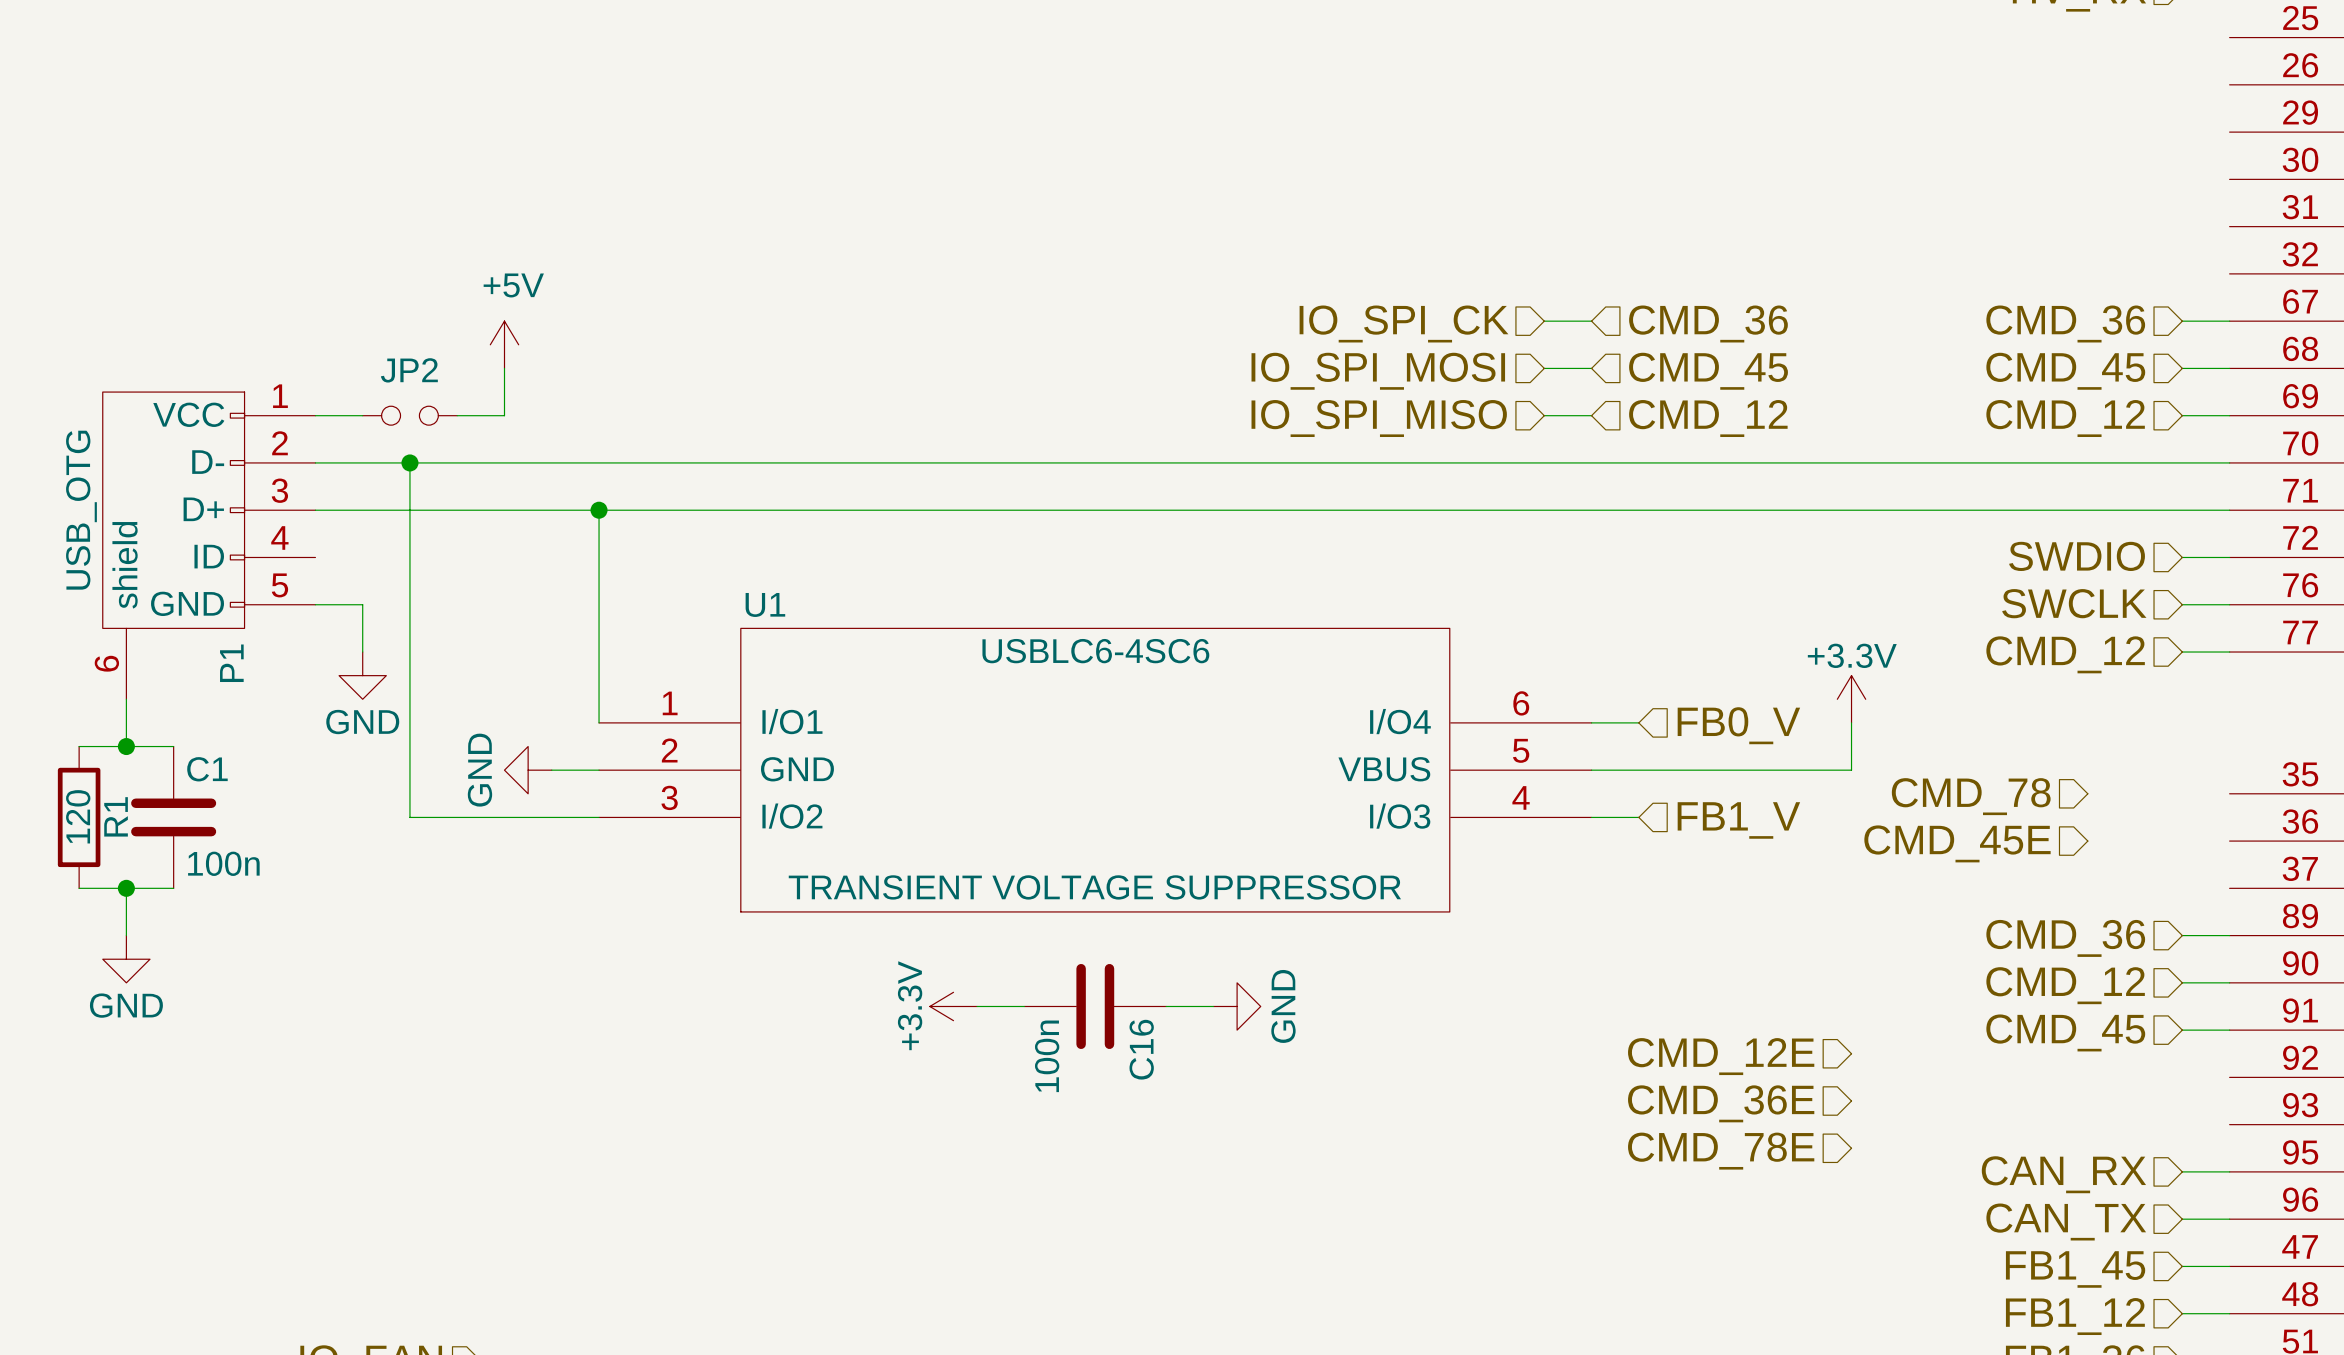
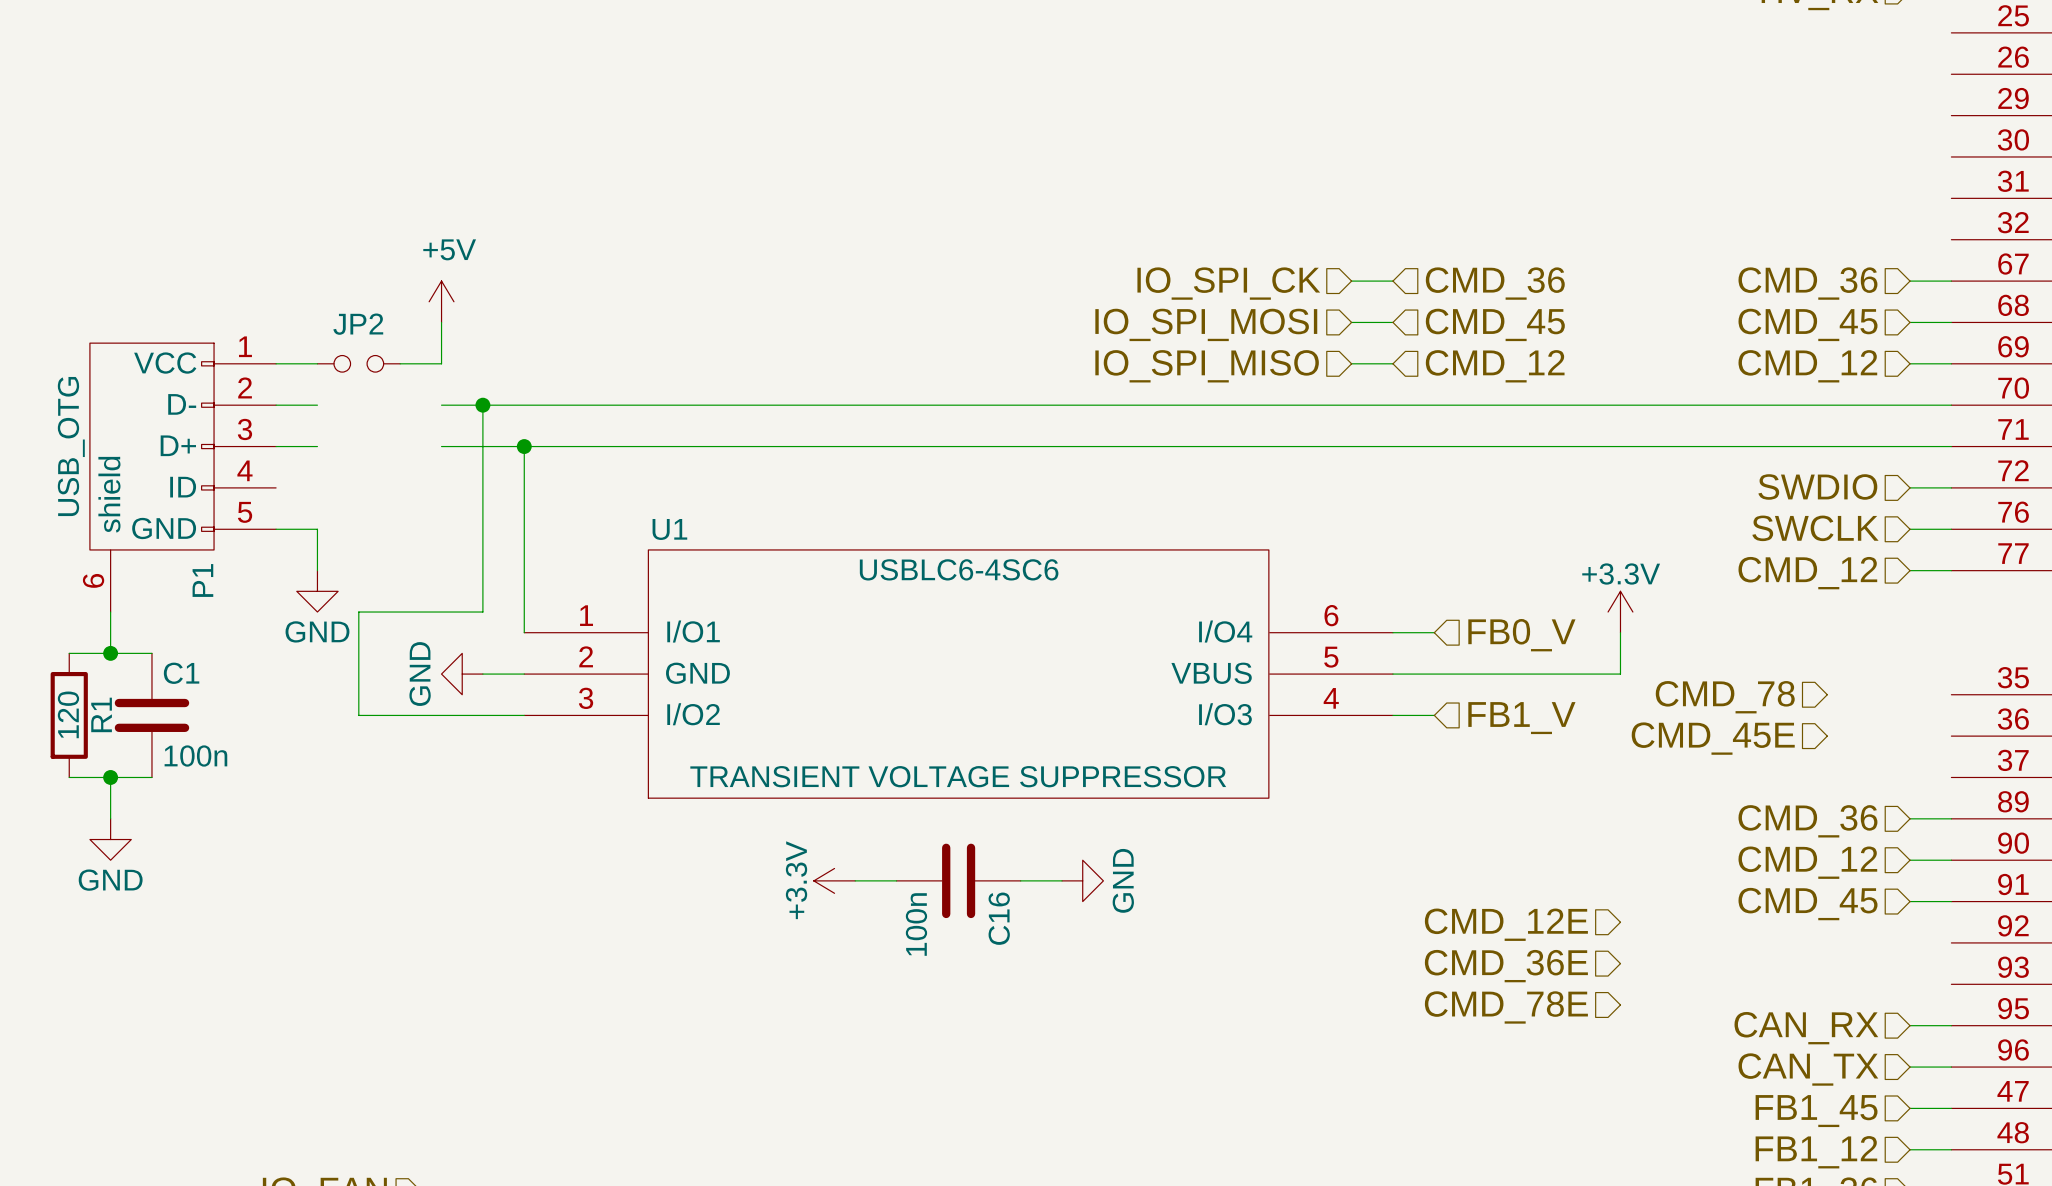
wire: (362, 462) (504, 462) -> none
wire: (409, 462) (409, 699) -> (482, 405) (482, 612) (358, 612)
junction: (409, 462) -> none
junction: none -> (482, 405)
wire: (362, 510) (504, 510) -> none

